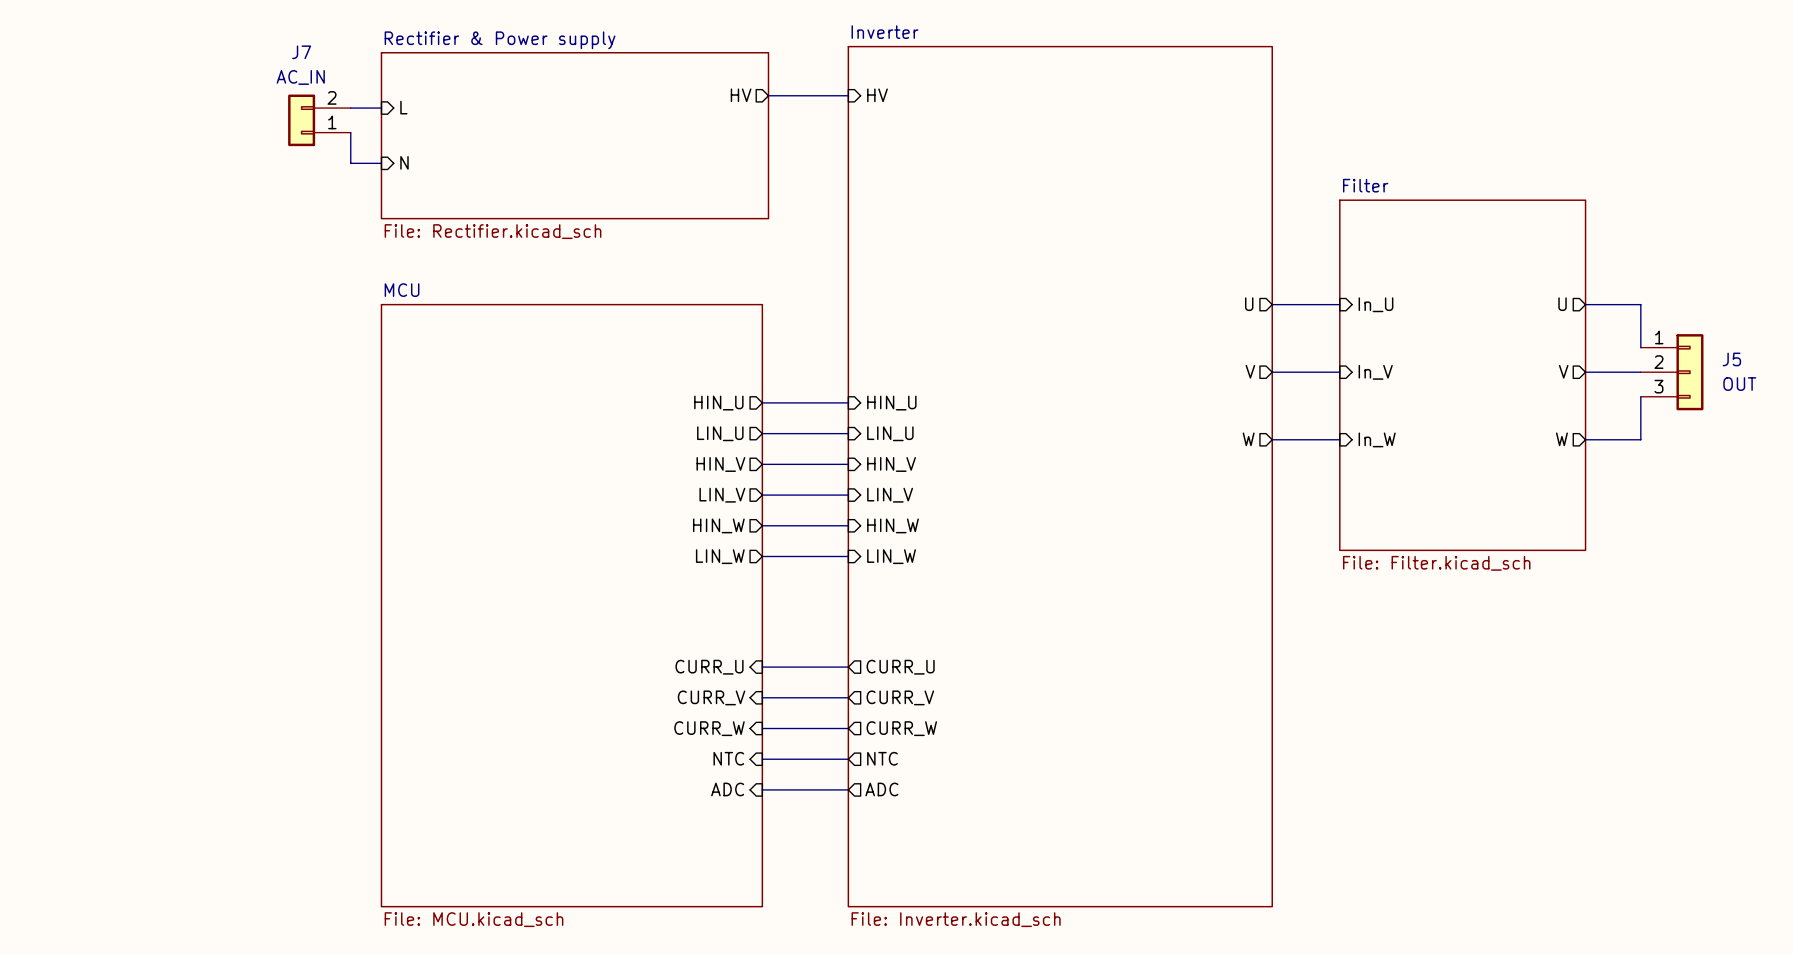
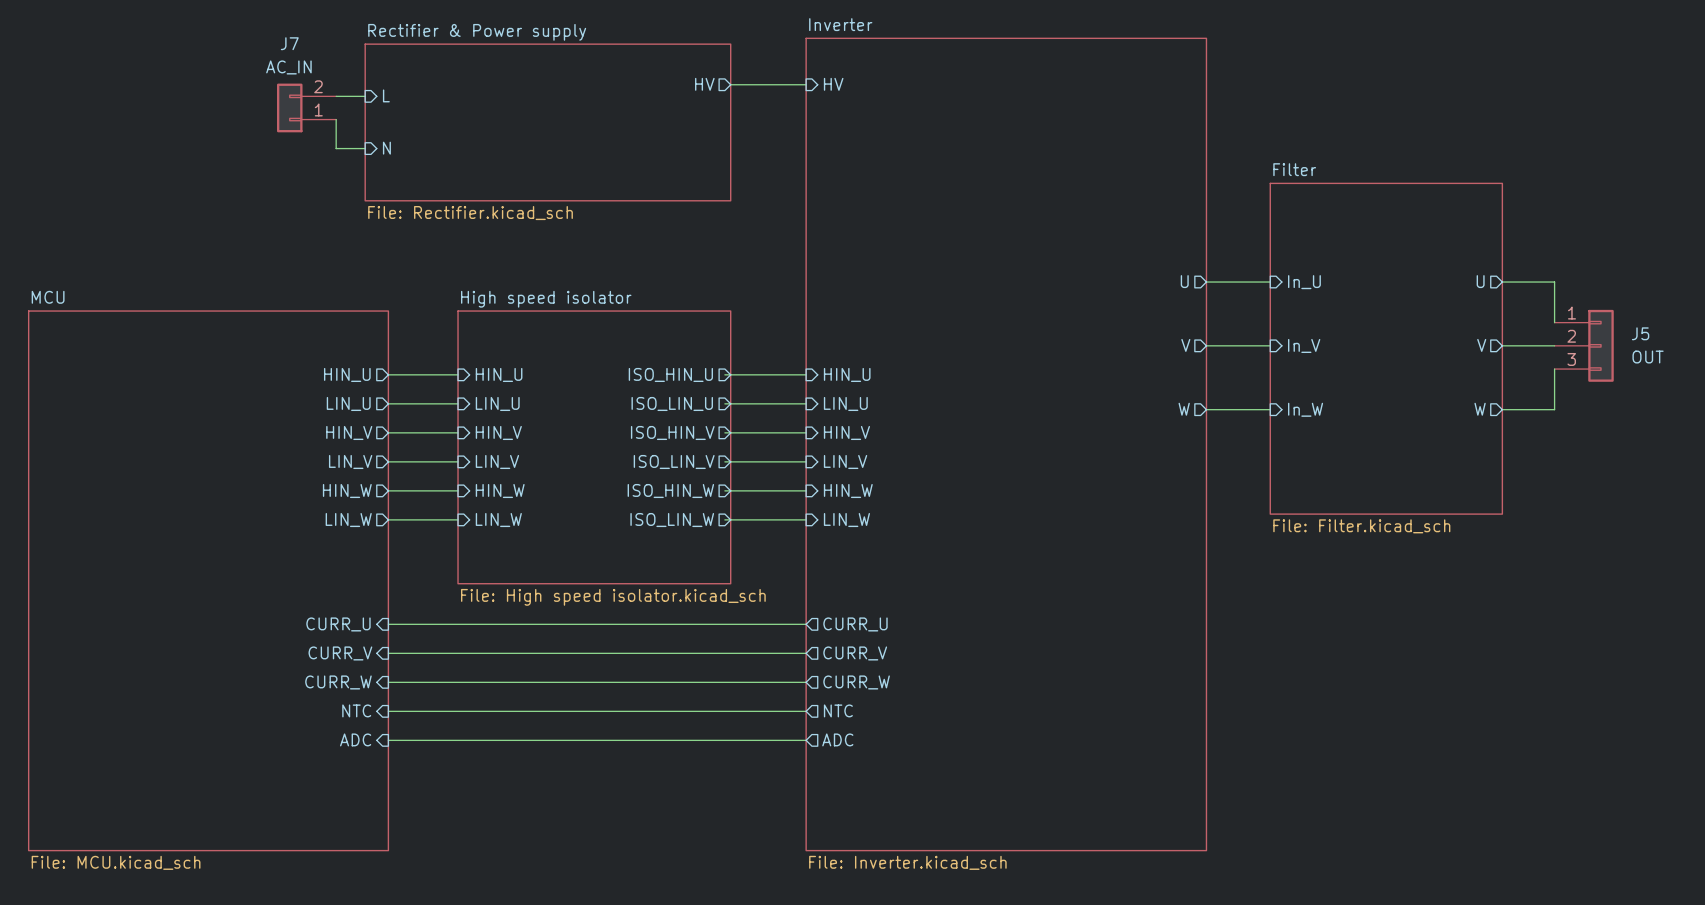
wire: none -> (388, 374) (458, 374)
sheet pin: none -> HIN_U (347, 374)
sheet pin: none -> HIN_U (499, 374)
sheet pin: HIN_U (718, 403) -> ISO_HIN_U (670, 374)
sheet pin: none -> LIN_U (348, 403)
wire: none -> (388, 403) (458, 403)
sheet pin: none -> LIN_U (497, 403)
sheet pin: LIN_U (720, 433) -> ISO_LIN_U (672, 403)
sheet pin: none -> HIN_V (349, 432)
wire: none -> (388, 432) (458, 432)
sheet pin: none -> HIN_V (498, 432)
sheet pin: HIN_V (720, 464) -> ISO_HIN_V (672, 432)
sheet High speed isolator: none -> File: High speed isolator.kicad_sch (594, 447)
sheet pin: none -> LIN_V (350, 461)
wire: none -> (388, 461) (458, 461)
sheet pin: none -> LIN_V (497, 461)
sheet pin: LIN_V (722, 495) -> ISO_LIN_V (674, 461)
sheet pin: none -> HIN_W (347, 491)
wire: none -> (388, 490) (458, 490)
sheet pin: none -> HIN_W (500, 491)
sheet pin: HIN_W (718, 525) -> ISO_HIN_W (670, 491)
sheet pin: none -> LIN_W (348, 520)
wire: none -> (388, 519) (458, 519)
sheet pin: none -> LIN_W (498, 520)
sheet pin: LIN_W (720, 556) -> ISO_LIN_W (672, 520)
sheet MCU: File: MCU.kicad_sch (571, 605) -> none
sheet MCU: none -> File: MCU.kicad_sch (208, 580)
sheet pin: none -> CURR_U (338, 624)
wire: none -> (388, 624) (724, 624)
sheet pin: CURR_U (709, 667) -> none
sheet pin: none -> CURR_V (340, 653)
wire: none -> (388, 653) (724, 653)
sheet pin: CURR_V (711, 697) -> none
sheet pin: none -> CURR_W (338, 682)
wire: none -> (388, 682) (724, 682)
sheet pin: CURR_W (709, 728) -> none
sheet pin: none -> NTC (356, 710)
sheet pin: NTC (728, 758) -> none
wire: none -> (388, 711) (724, 711)
sheet pin: none -> ADC (355, 739)
wire: none -> (388, 740) (724, 740)
sheet pin: ADC (727, 789) -> none

